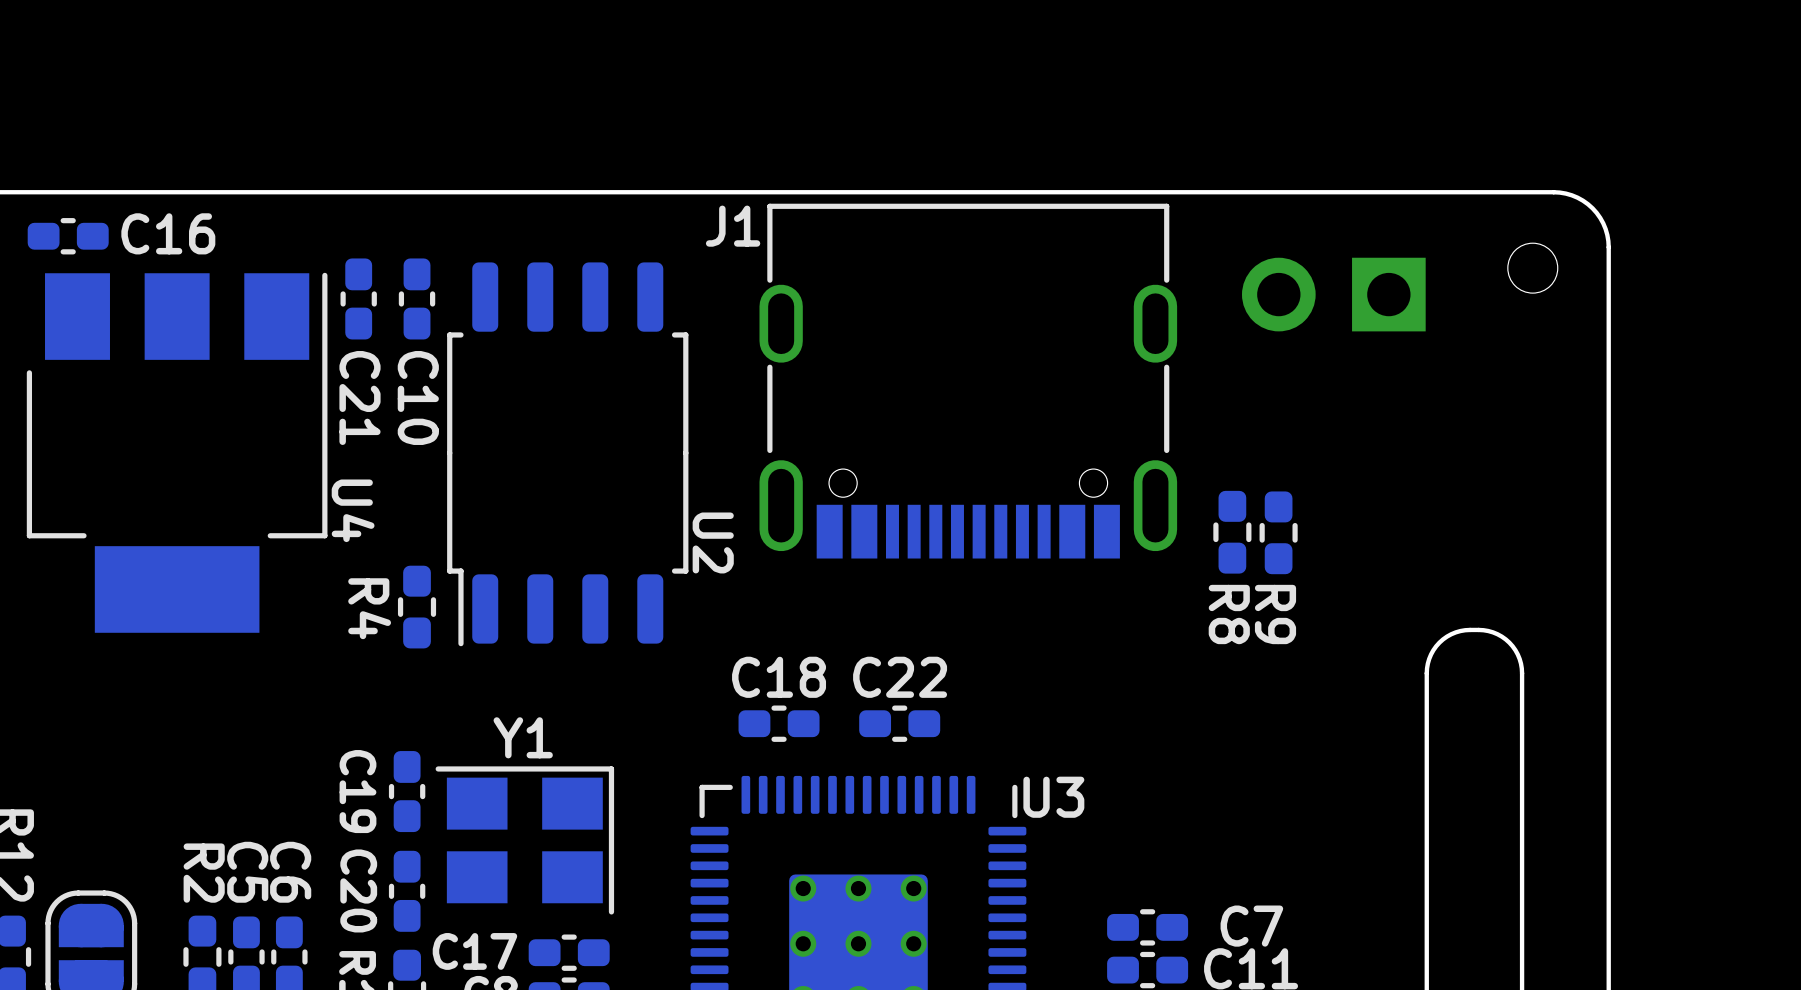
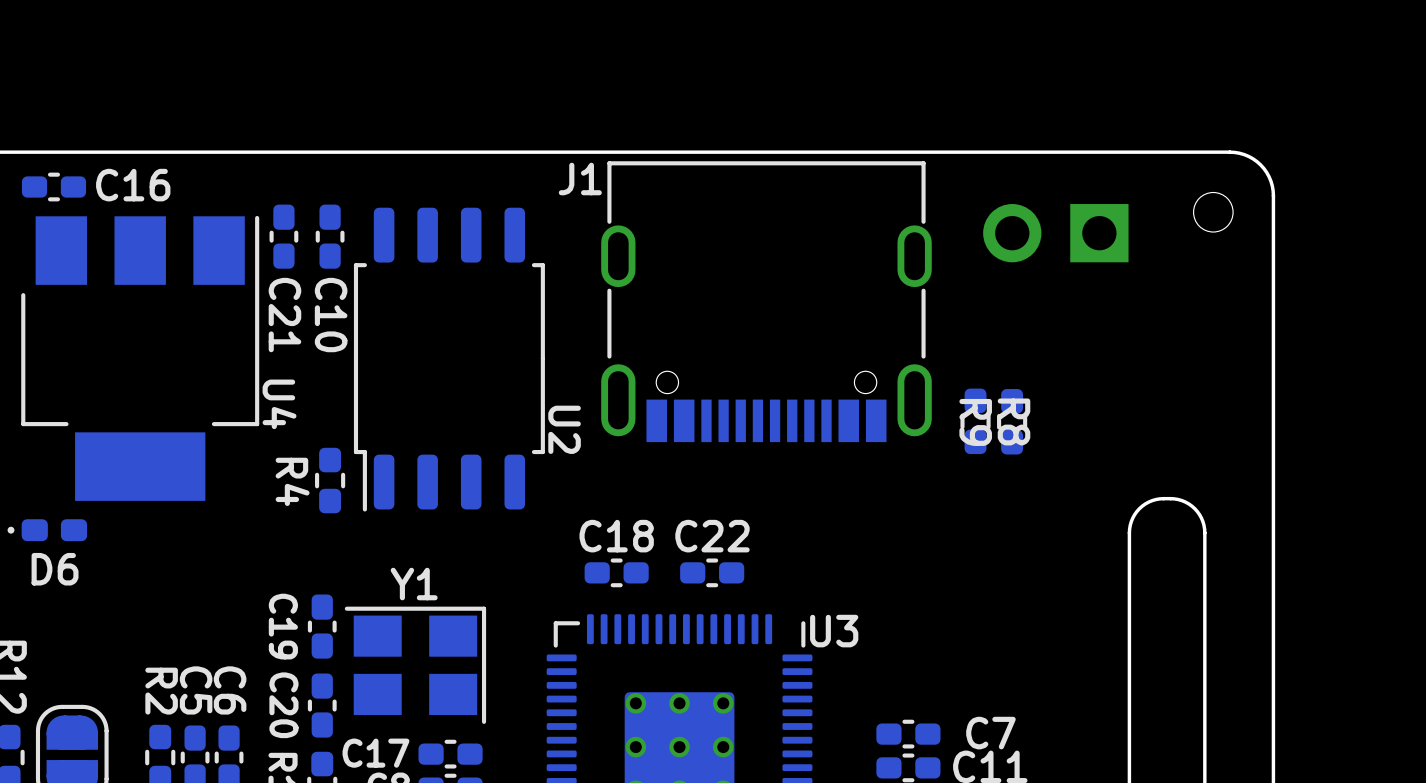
R8 name position: R8 (1229, 614) -> R8 (1014, 421)
R9 name position: R9 (1275, 614) -> R9 (975, 422)
D6: none -> (47, 530)

